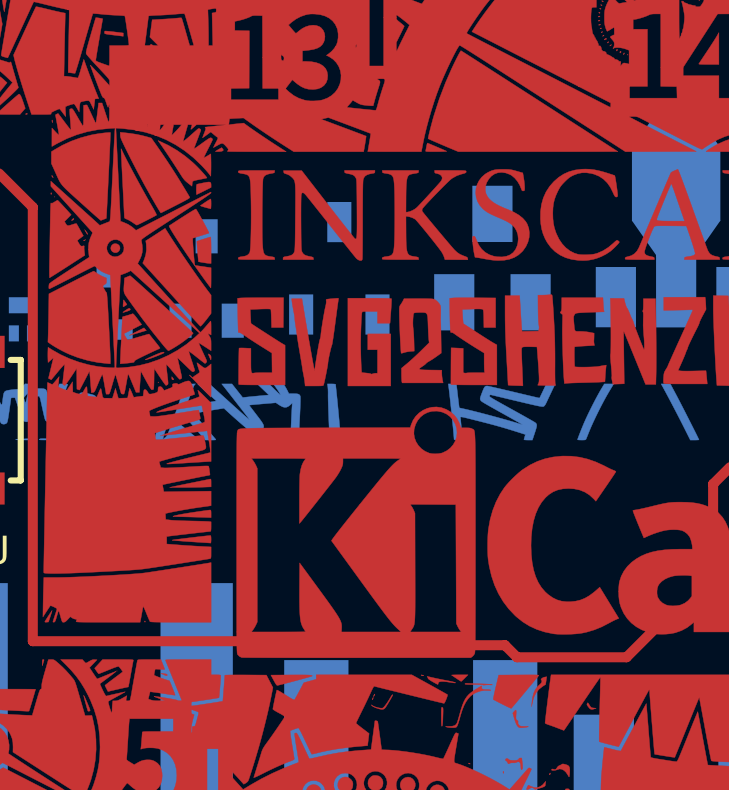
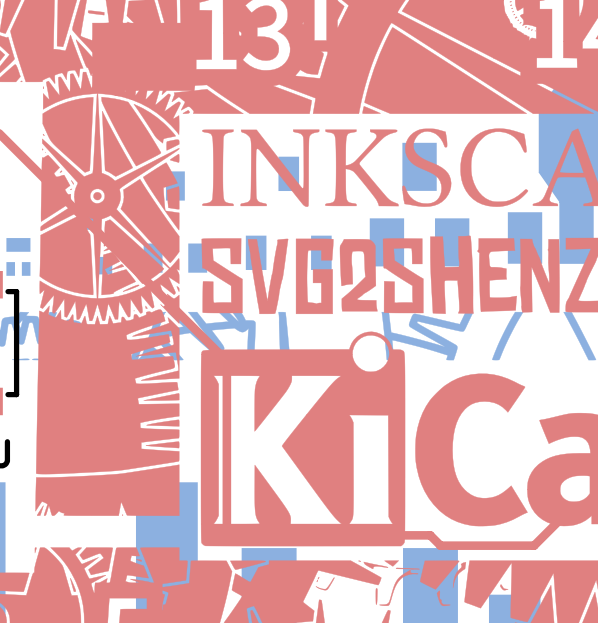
top track: (32, 207) (32, 641) (262, 641) (264, 643) -> (26, 161) (226, 361) (226, 535)

